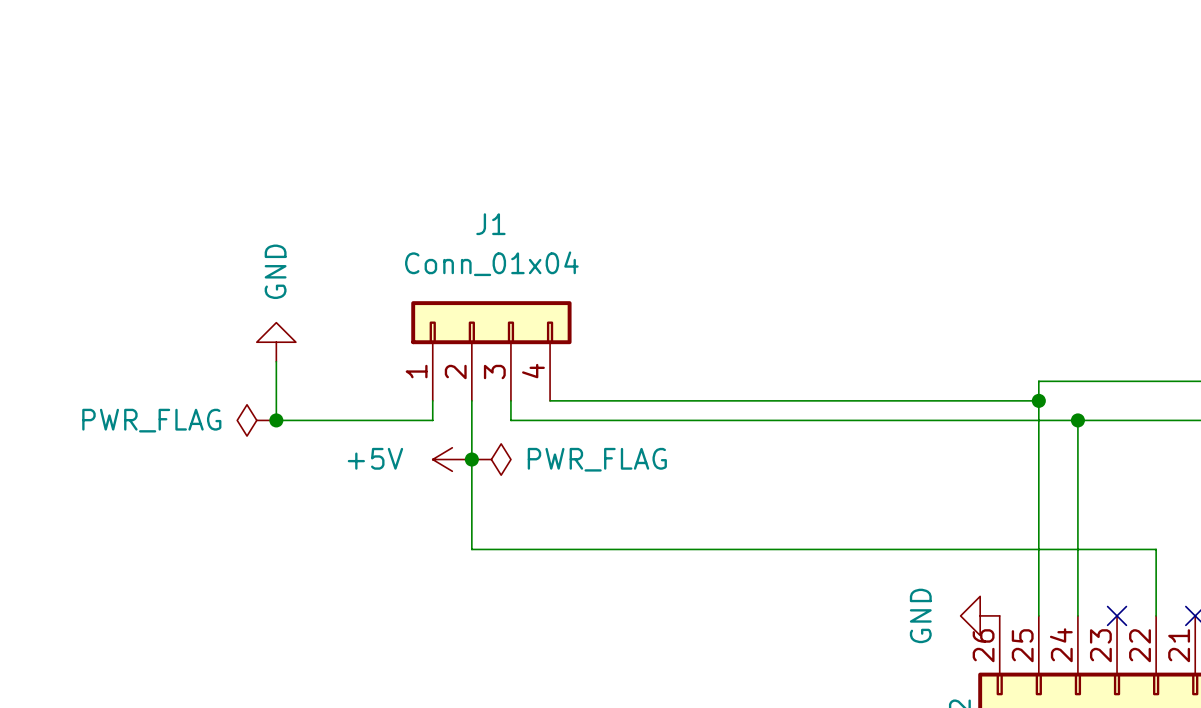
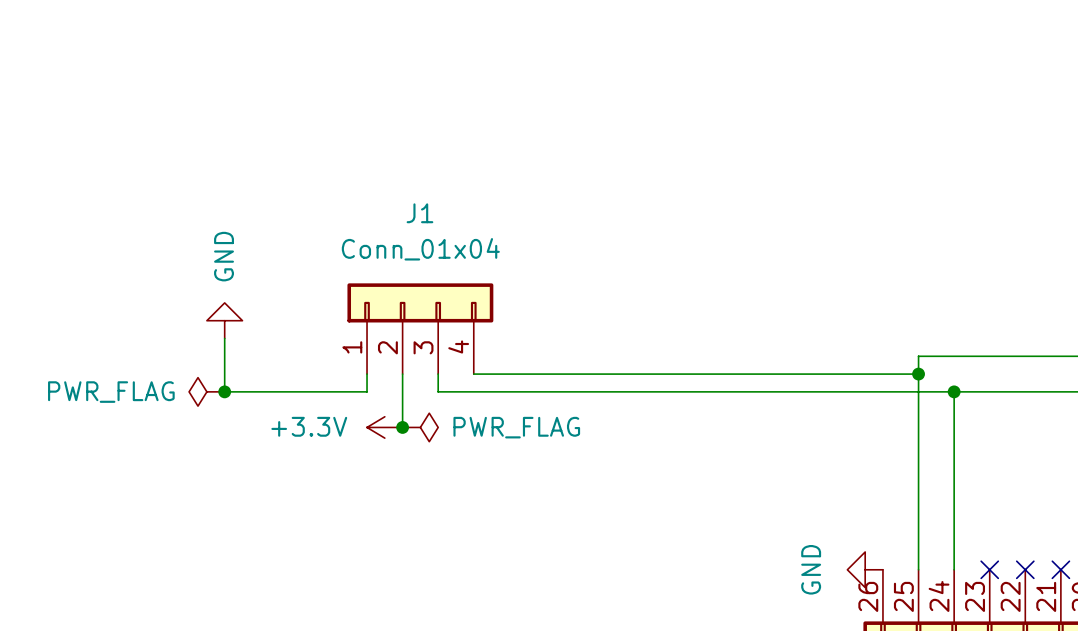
power symbol: +5V (452, 459) -> +3.3V (384, 427)
wire: (471, 459) (471, 549) (1156, 549) (1156, 615) -> none
no-connect mark: none -> (1025, 569)

